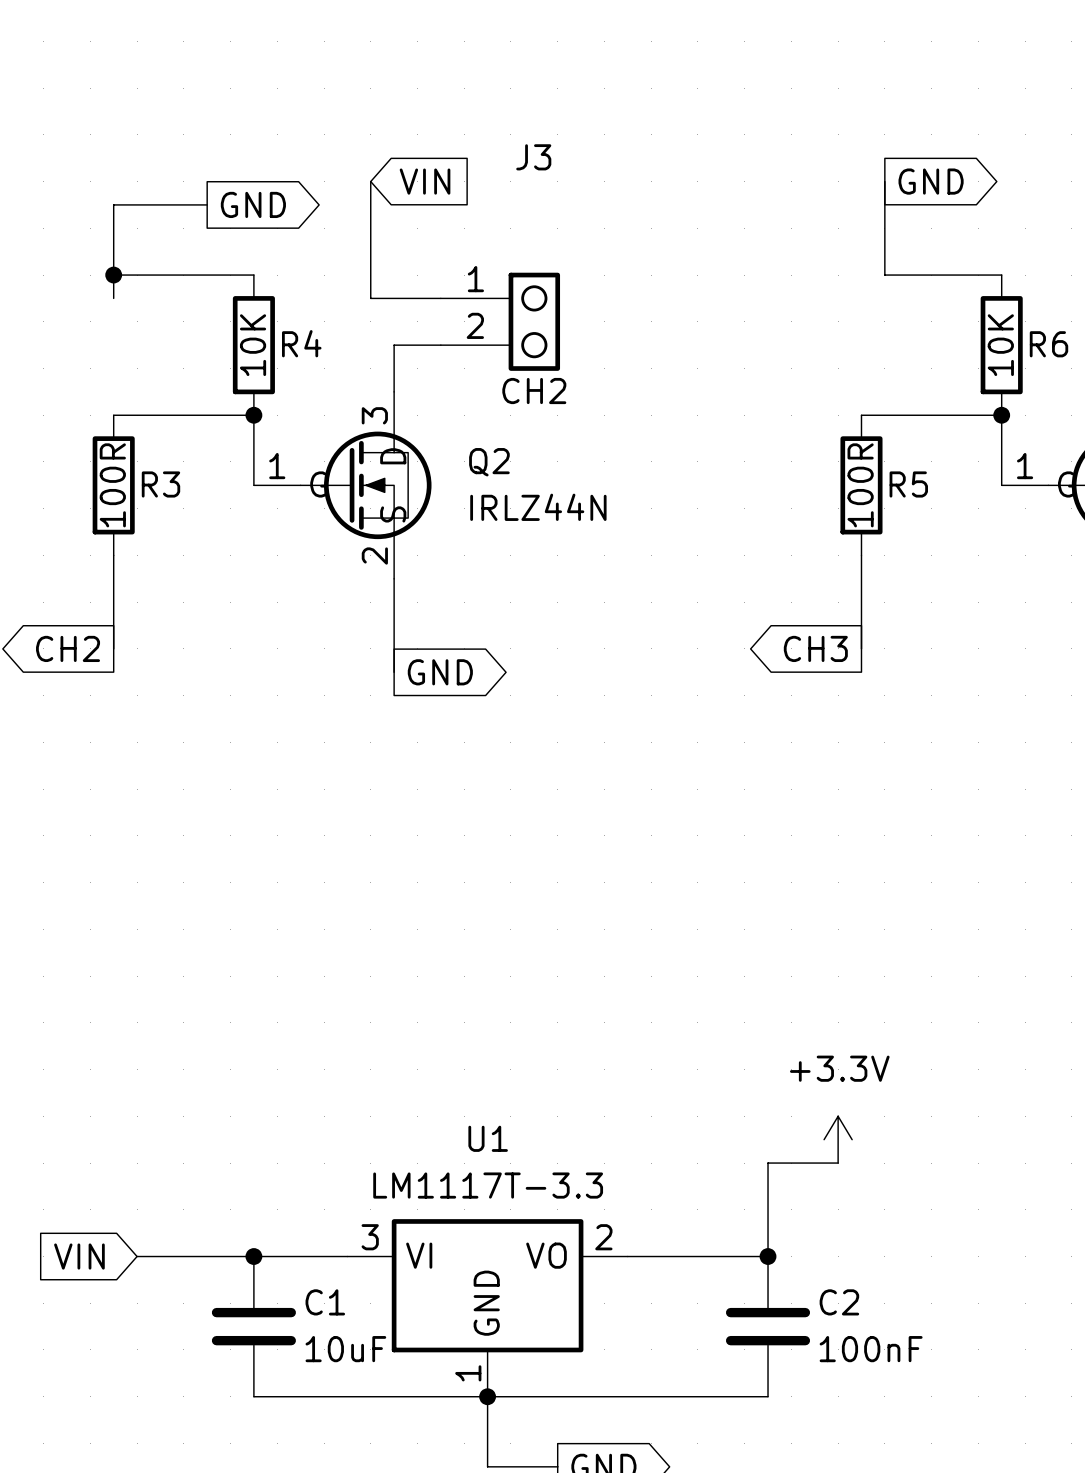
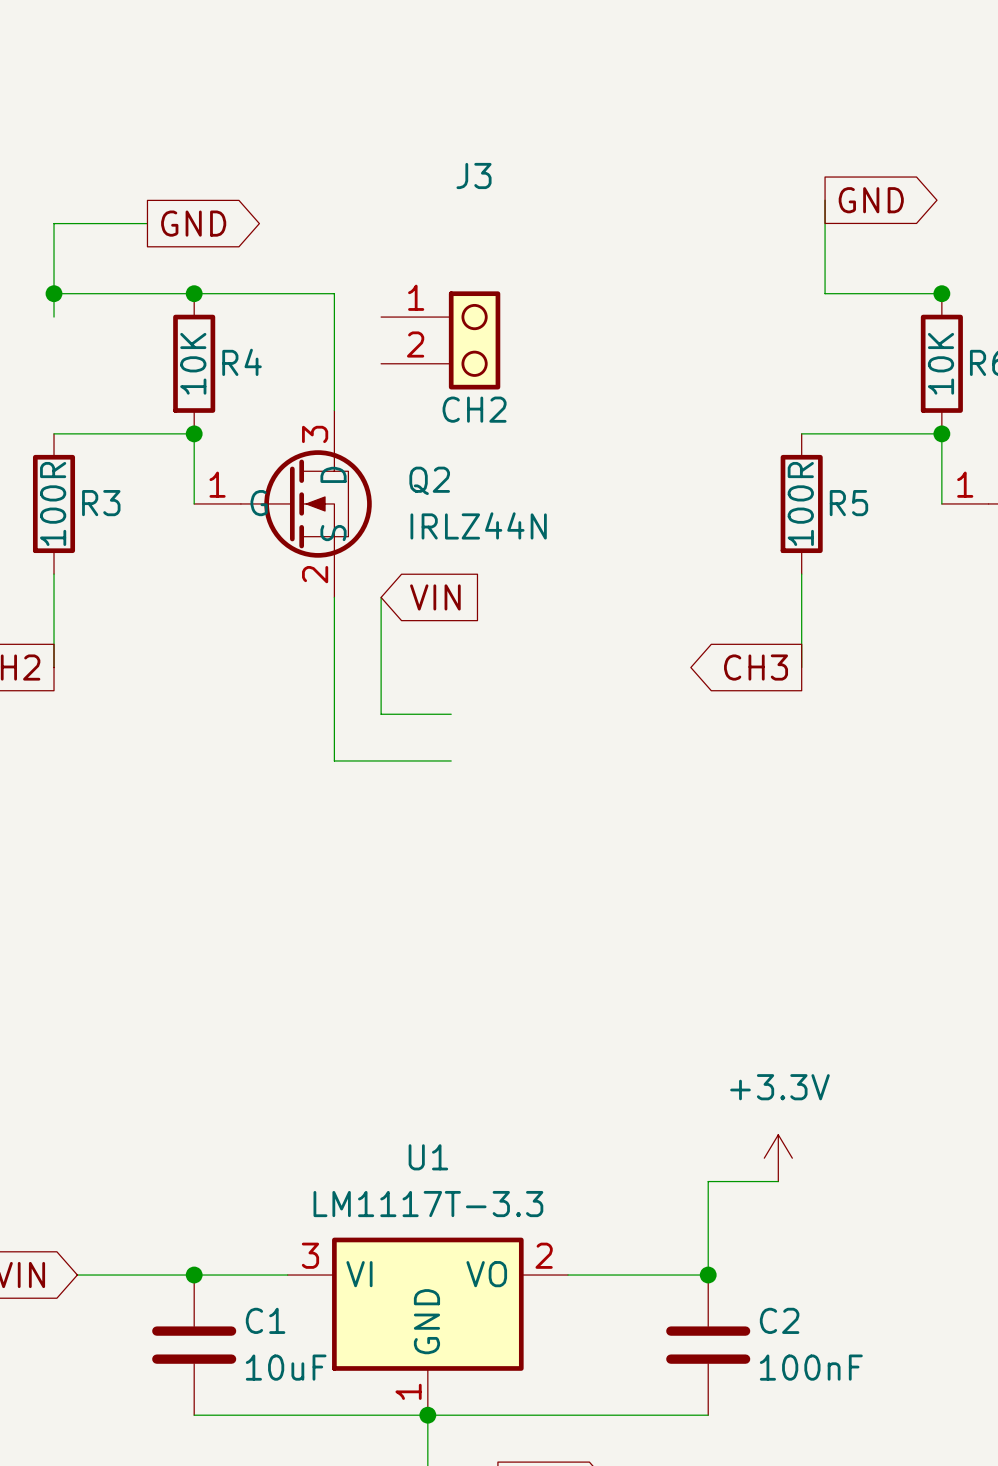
wire: (370, 181) (370, 298) (440, 298) -> (381, 597) (381, 714) (451, 714)
global label: VIN (425, 181) -> none
junction: none -> (194, 293)
junction: none -> (941, 293)
wire: (394, 345) (440, 345) -> (334, 363) (334, 293) (194, 293)
global label: none -> VIN (435, 597)
wire: none -> (334, 690) (334, 760) (451, 760)
global label: GND (440, 672) -> none

